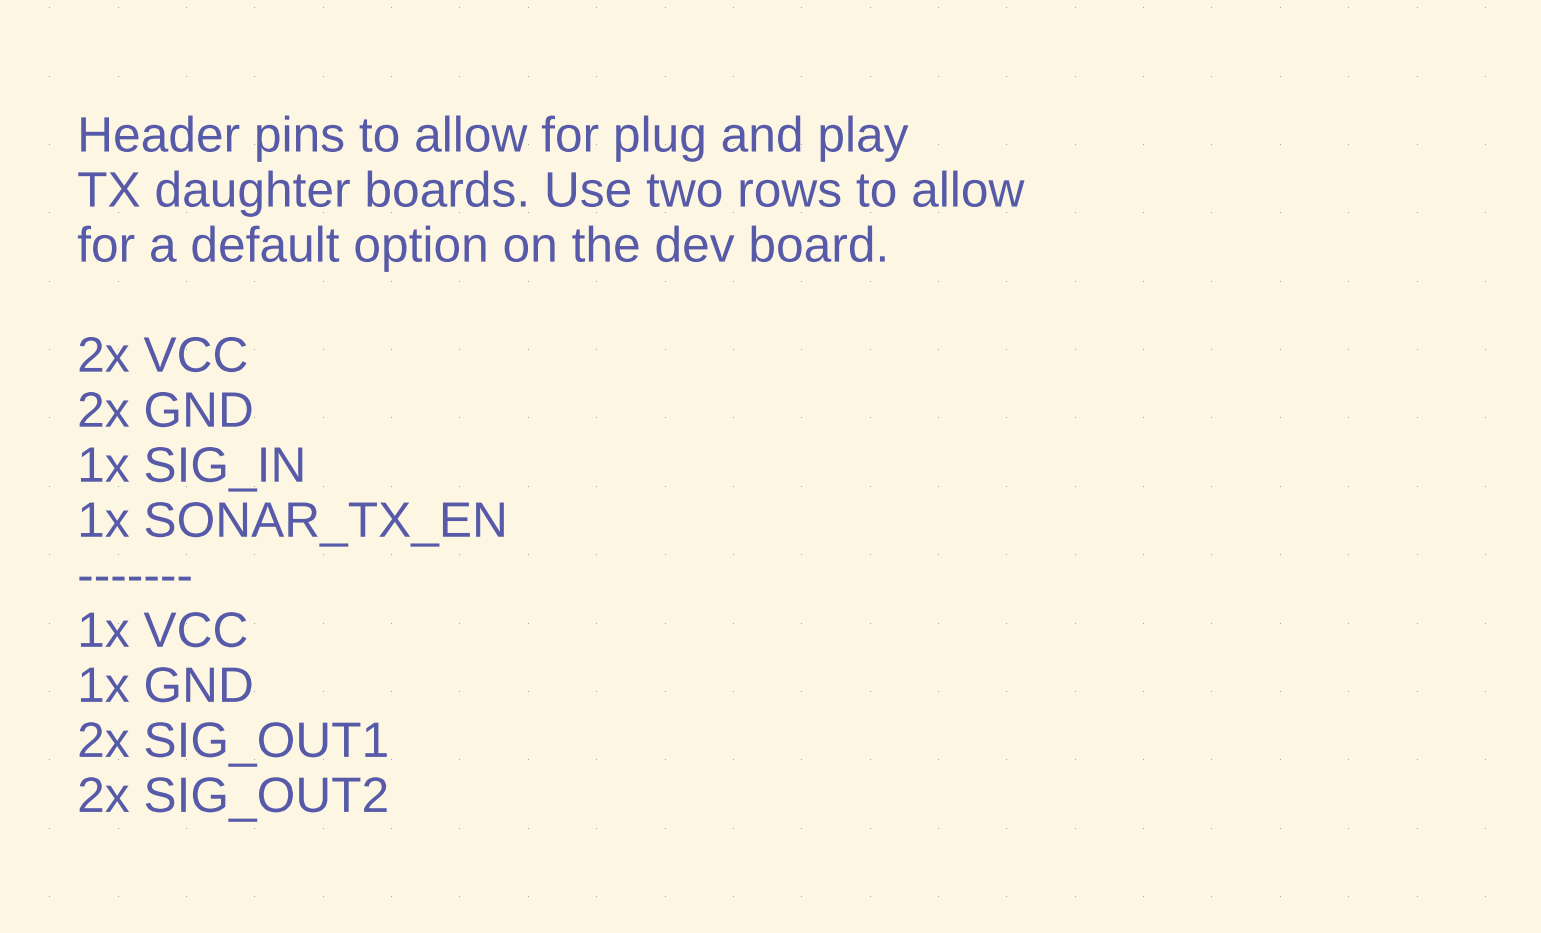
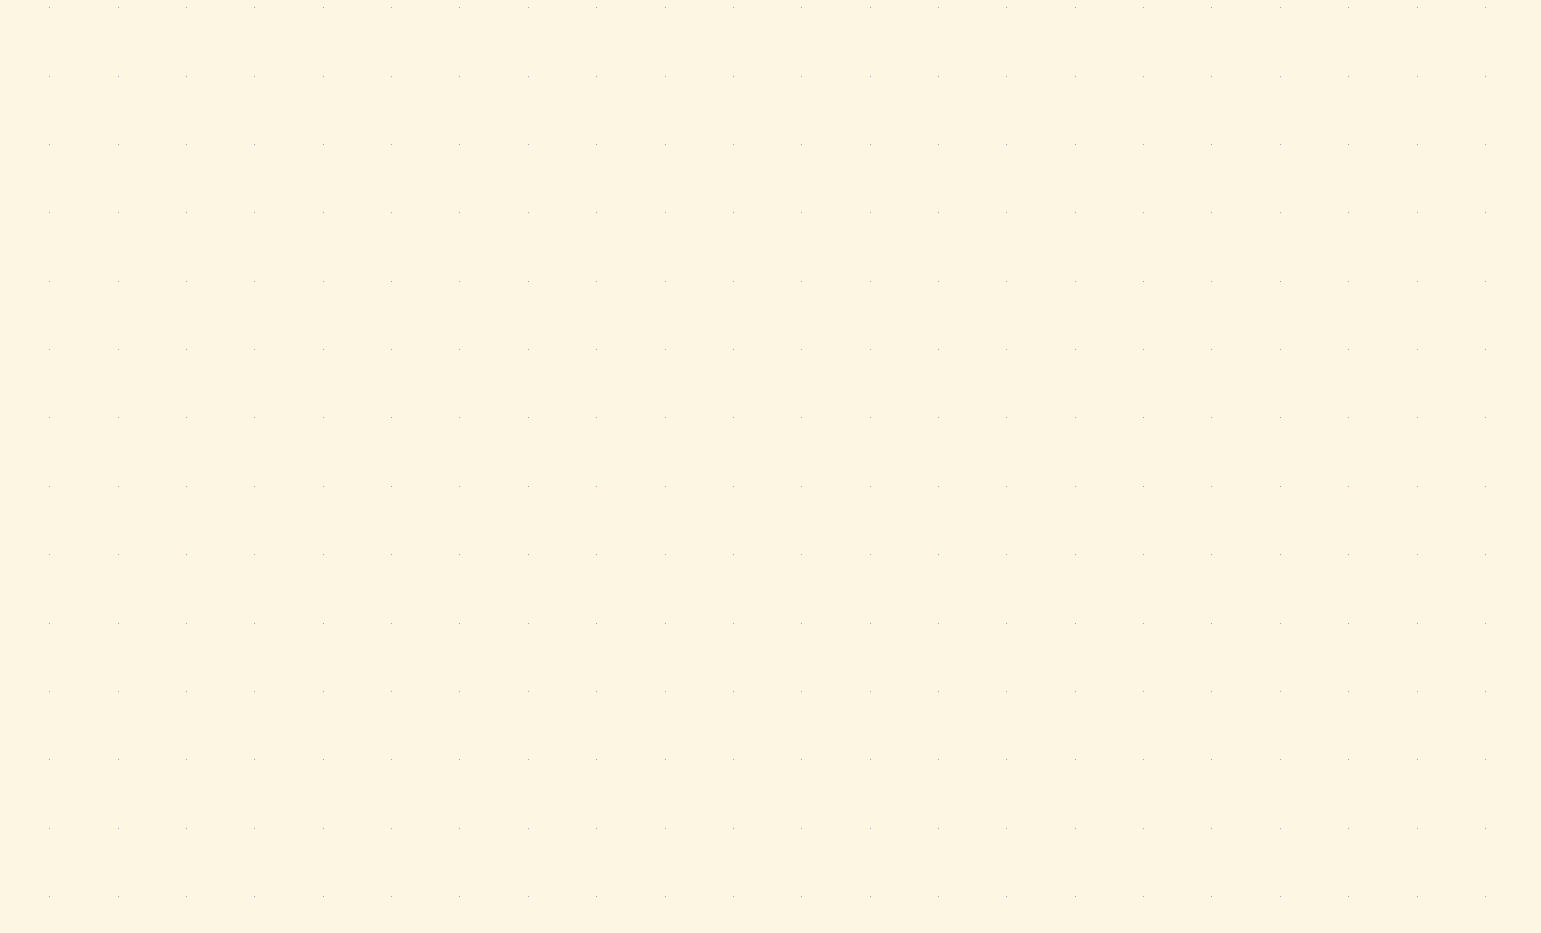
text: Header pins to allow for plug and play (494, 138) -> none
text: TX daughter boards. Use two rows to allow (551, 193) -> none
text: for a default option on the dev board. (481, 248) -> none
text: 2x VCC (163, 354) -> none
text: 2x GND (165, 409) -> none
text: 1x SIG_IN (191, 469) -> none
text: 1x SONAR_TX_EN (292, 524) -> none
text: ------- (135, 578) -> none
text: 1x VCC (163, 629) -> none
text: 1x GND (166, 684) -> none
text: 2x SIG_OUT1 (233, 744) -> none
text: 2x SIG_OUT2 (233, 799) -> none

